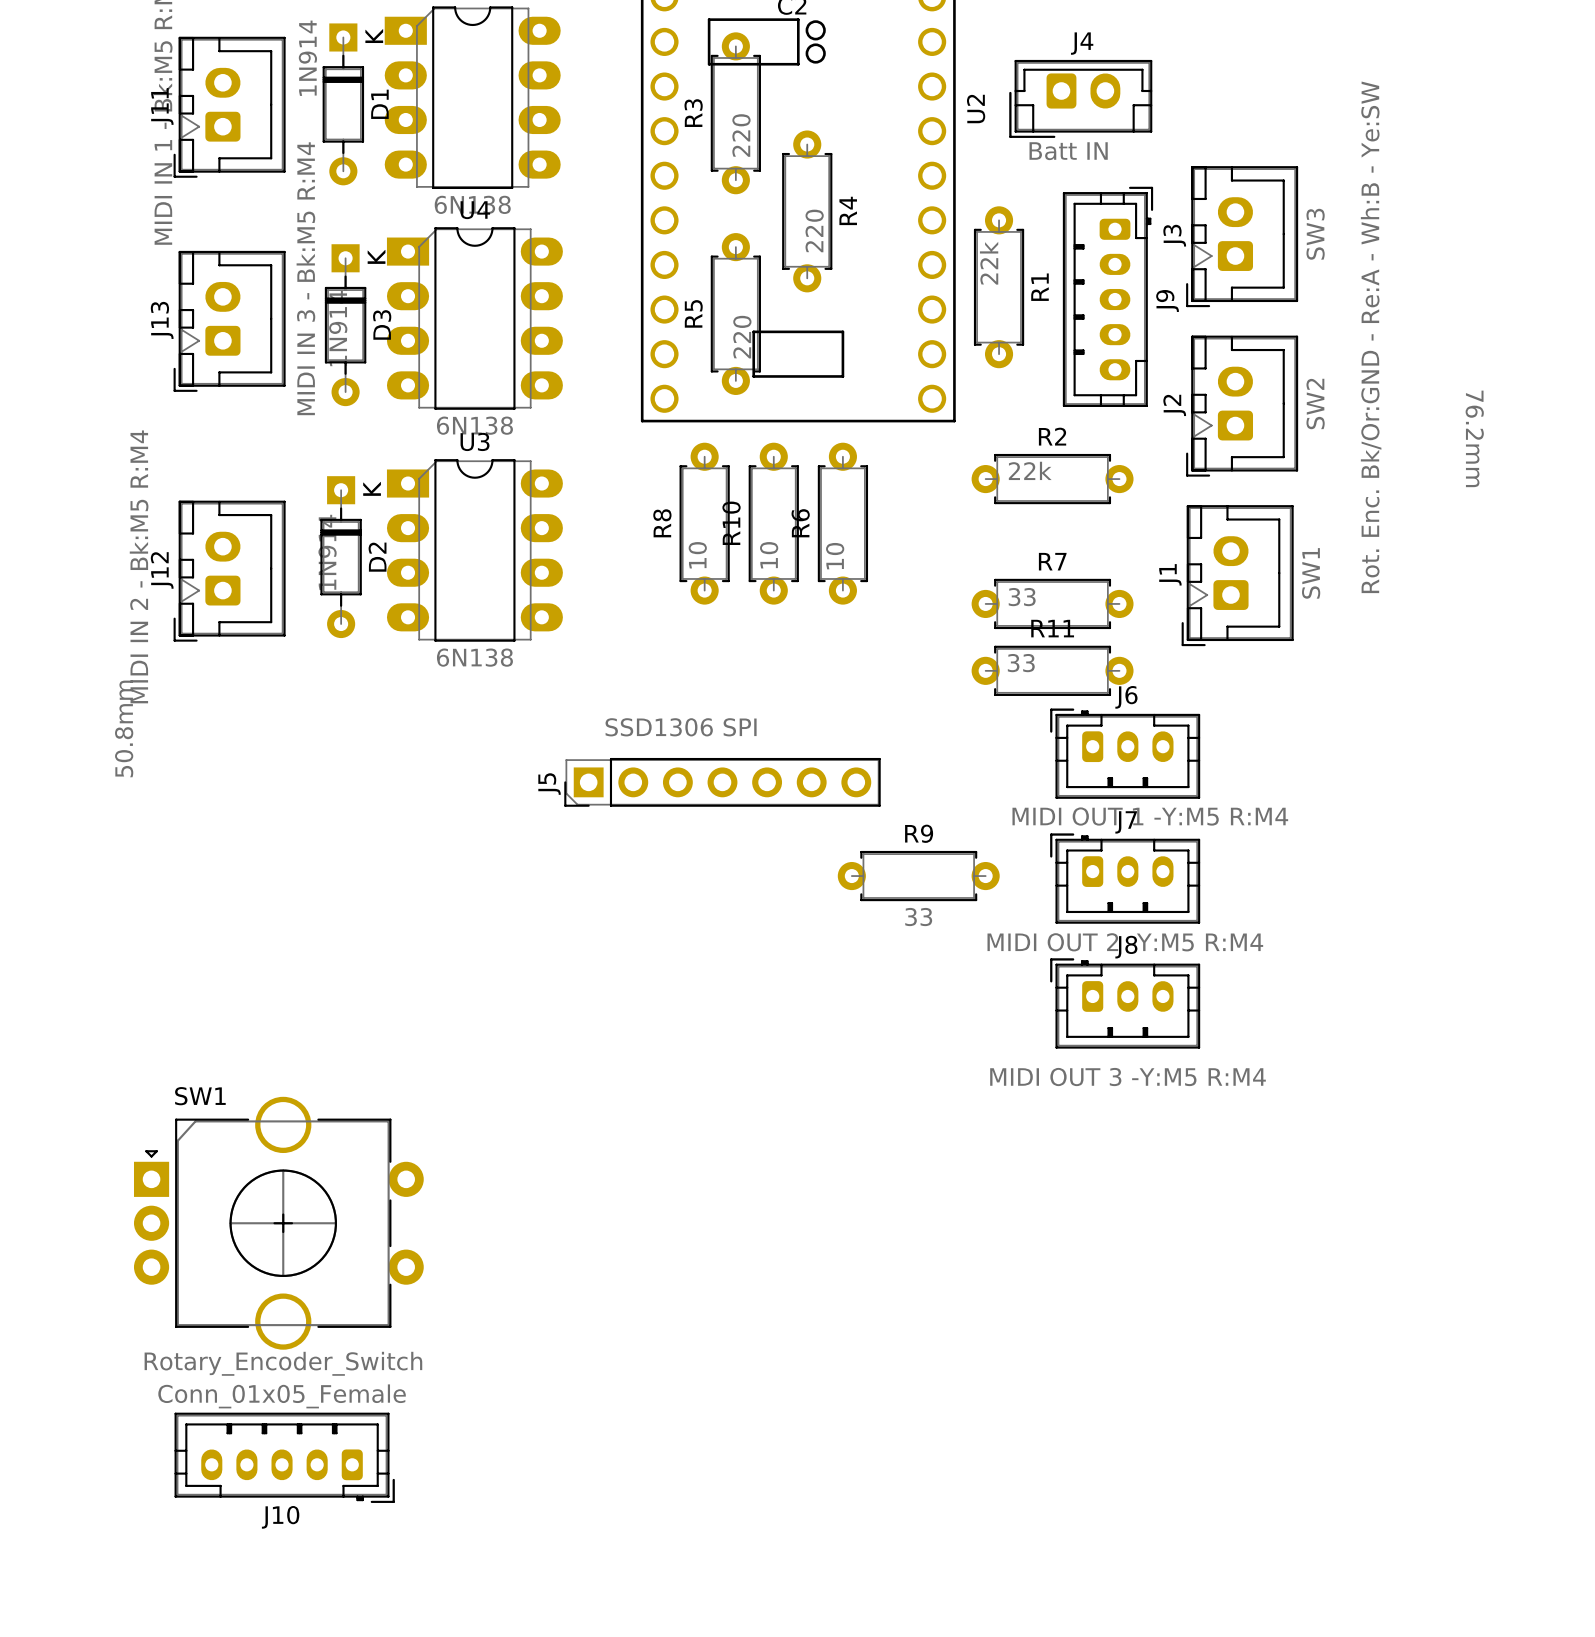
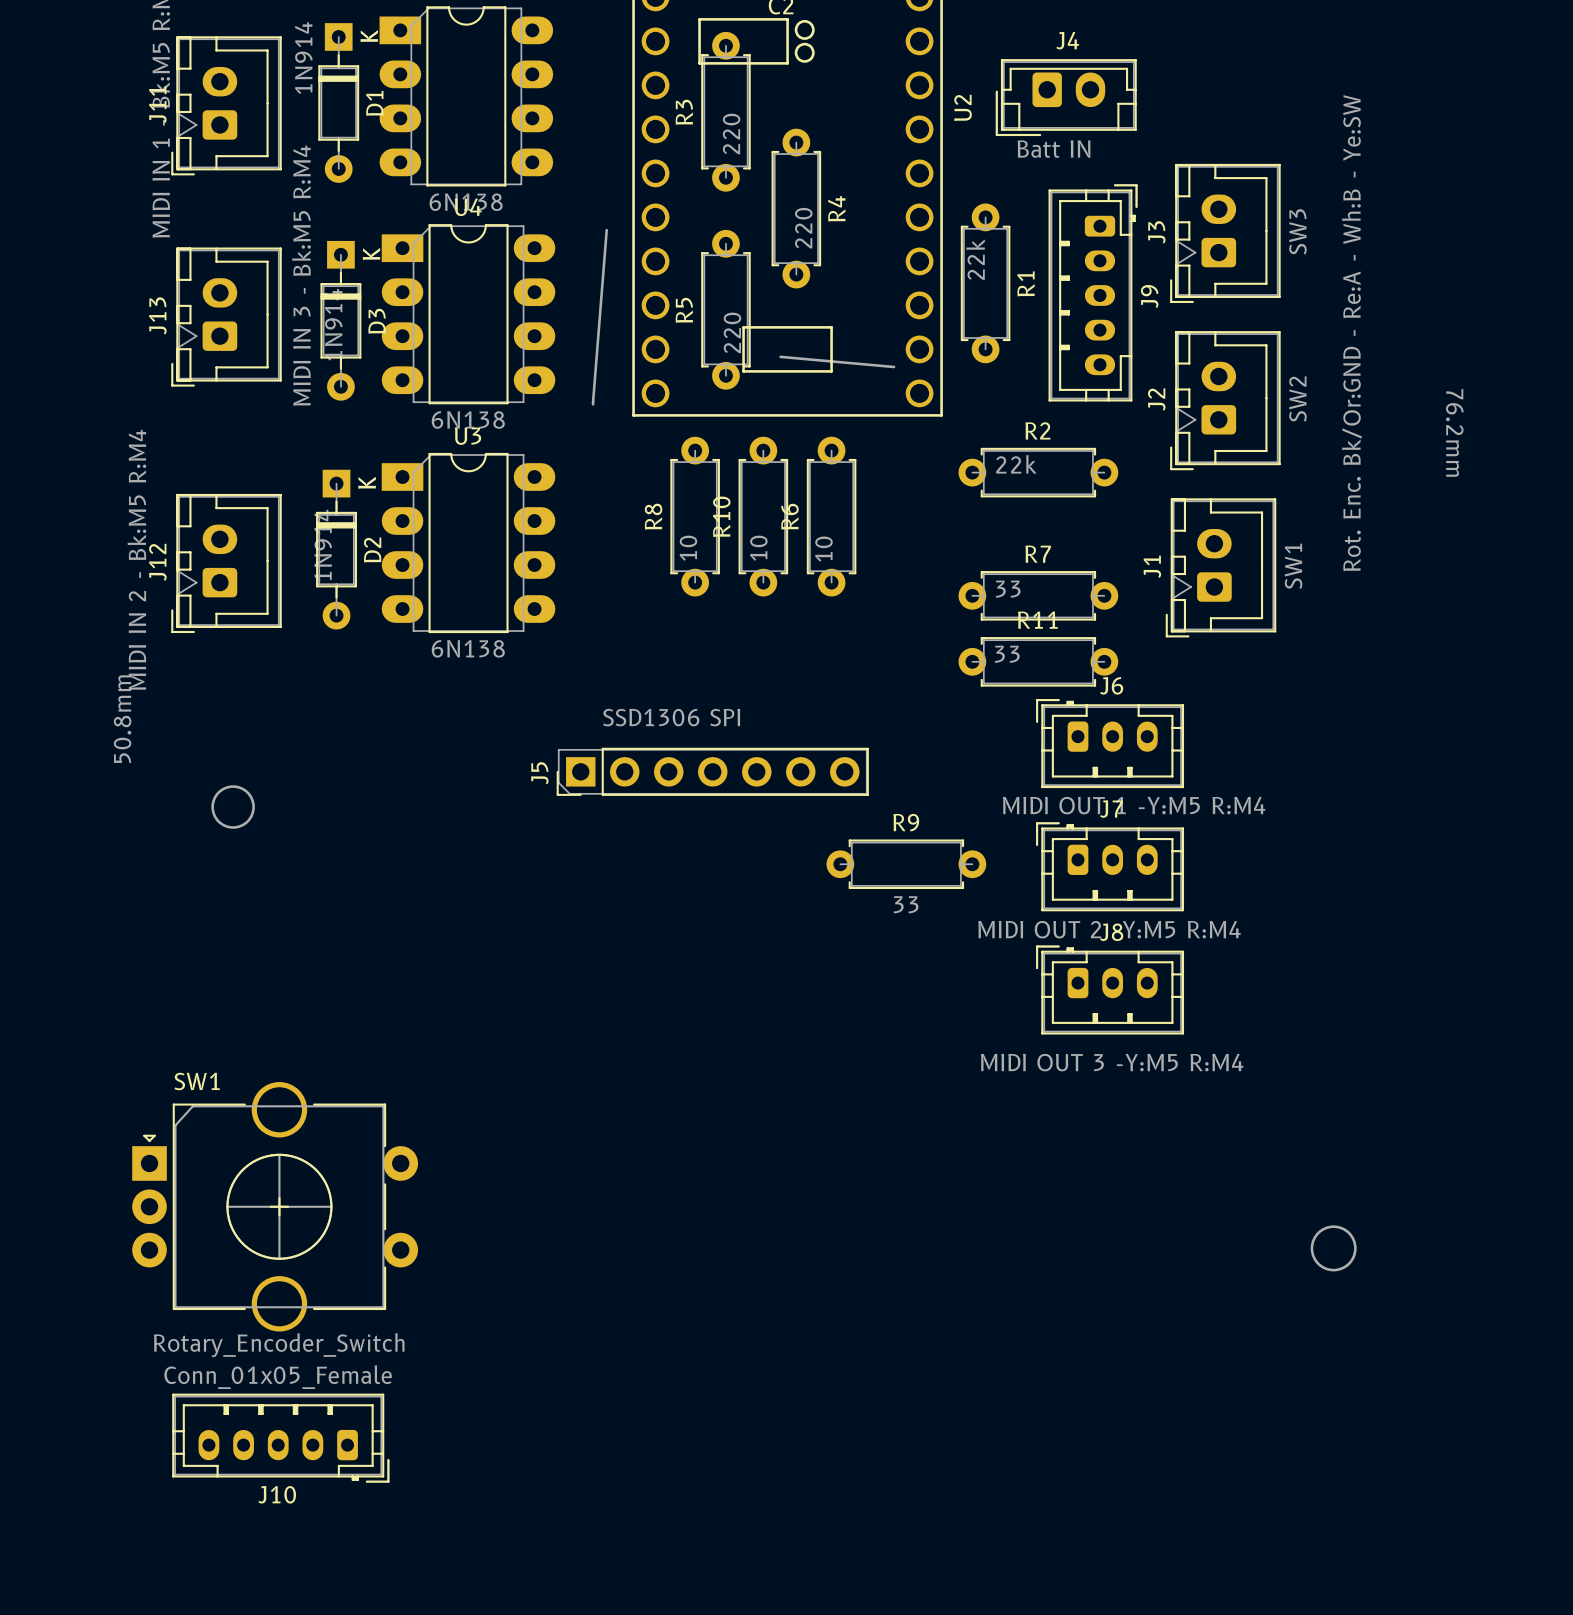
line: none -> (606, 230) (593, 404)
line: none -> (780, 356) (894, 367)
drawing: none -> [211, 785, 255, 829]
drawing: none -> [1310, 1225, 1357, 1272]

